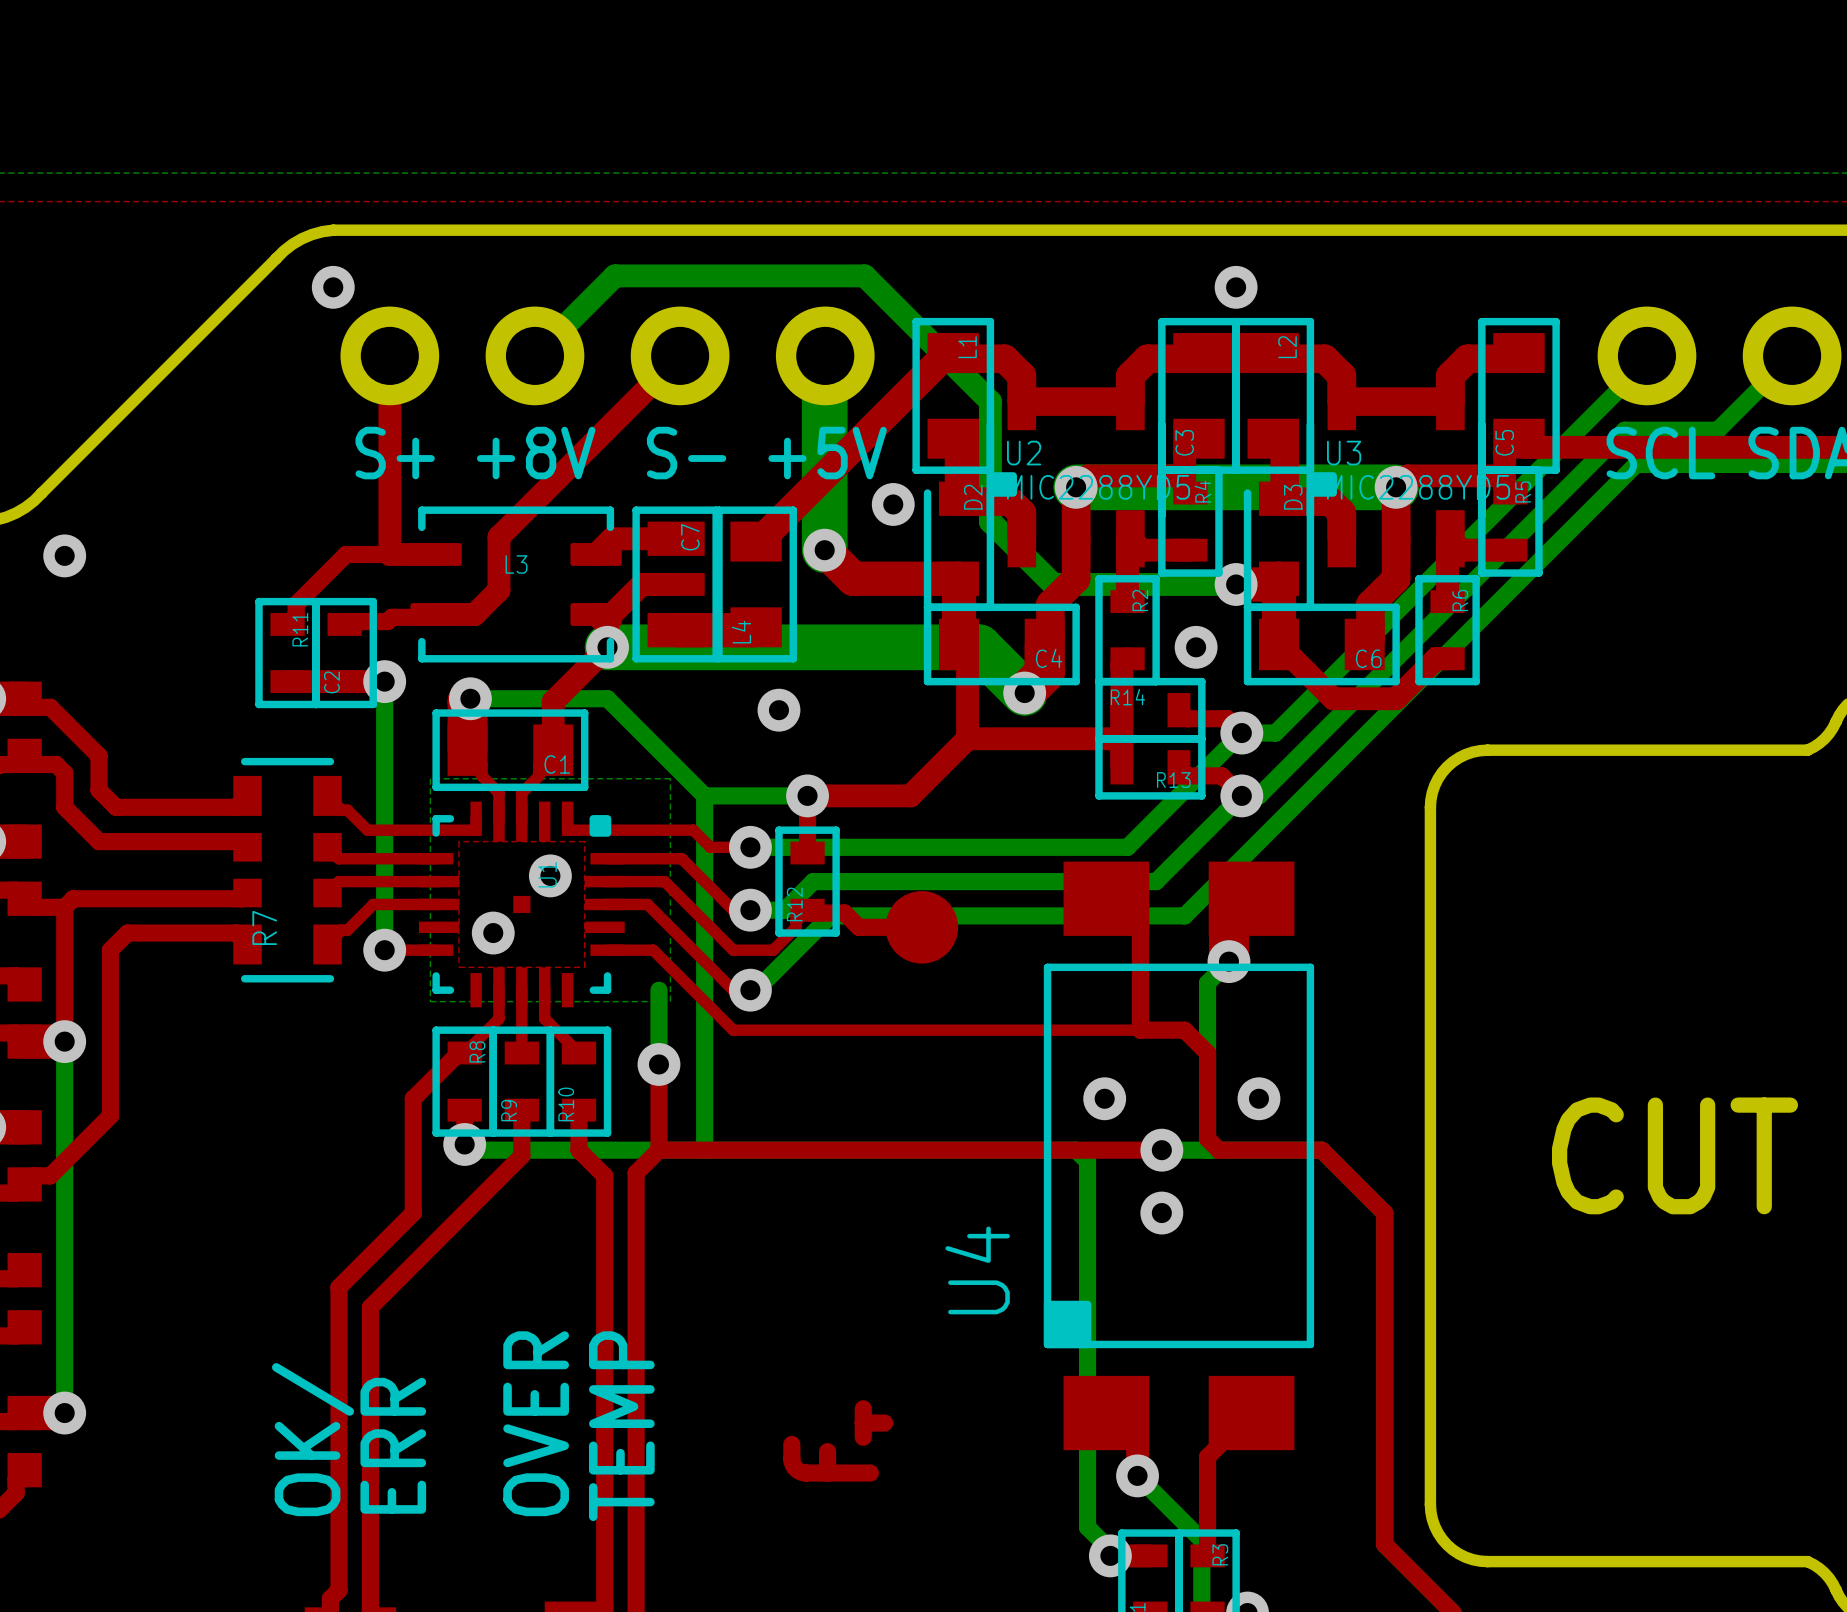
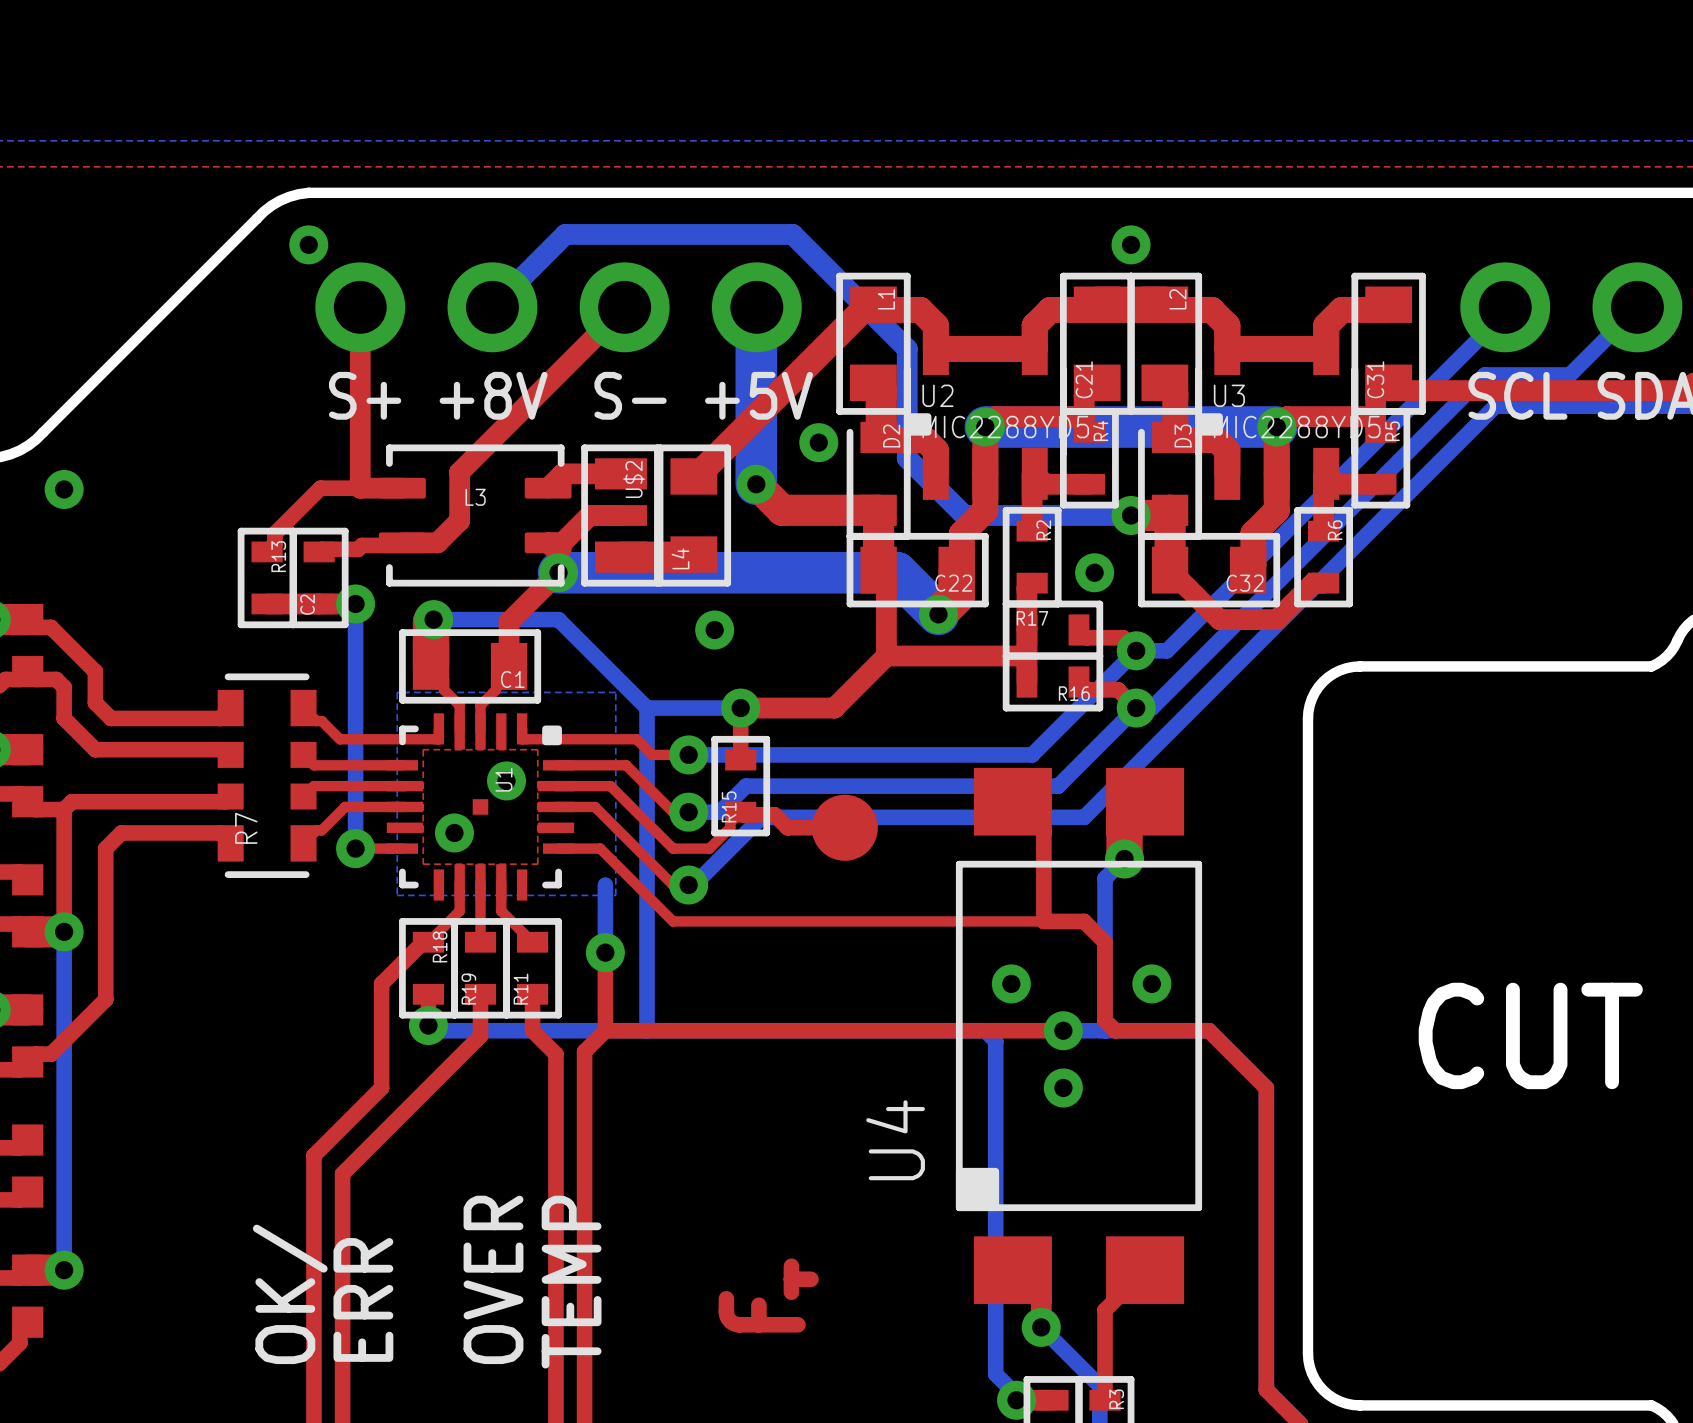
C3 name: C3 (1184, 442) -> C21 (1084, 379)
C5 name: C5 (1504, 442) -> C31 (1375, 379)
C7 name: C7 (690, 537) -> U$2 (634, 479)
R11 name: R11 (300, 629) -> R13 (278, 556)
C4 name: C4 (1049, 658) -> C22 (953, 583)
C6 name: C6 (1368, 658) -> C32 (1245, 583)
R14 name: R14 (1127, 697) -> R17 (1032, 618)
R13 name: R13 (1173, 780) -> R16 (1074, 693)
R12 name: R12 (794, 904) -> R15 (729, 806)
R8 name: R8 (477, 1051) -> R18 (440, 946)
R10 name: R10 (566, 1104) -> R11 (520, 989)
R9 name: R9 (509, 1110) -> R19 (468, 989)

